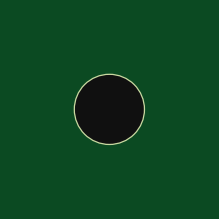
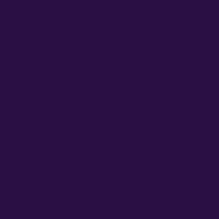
part: (109, 109) -> none

